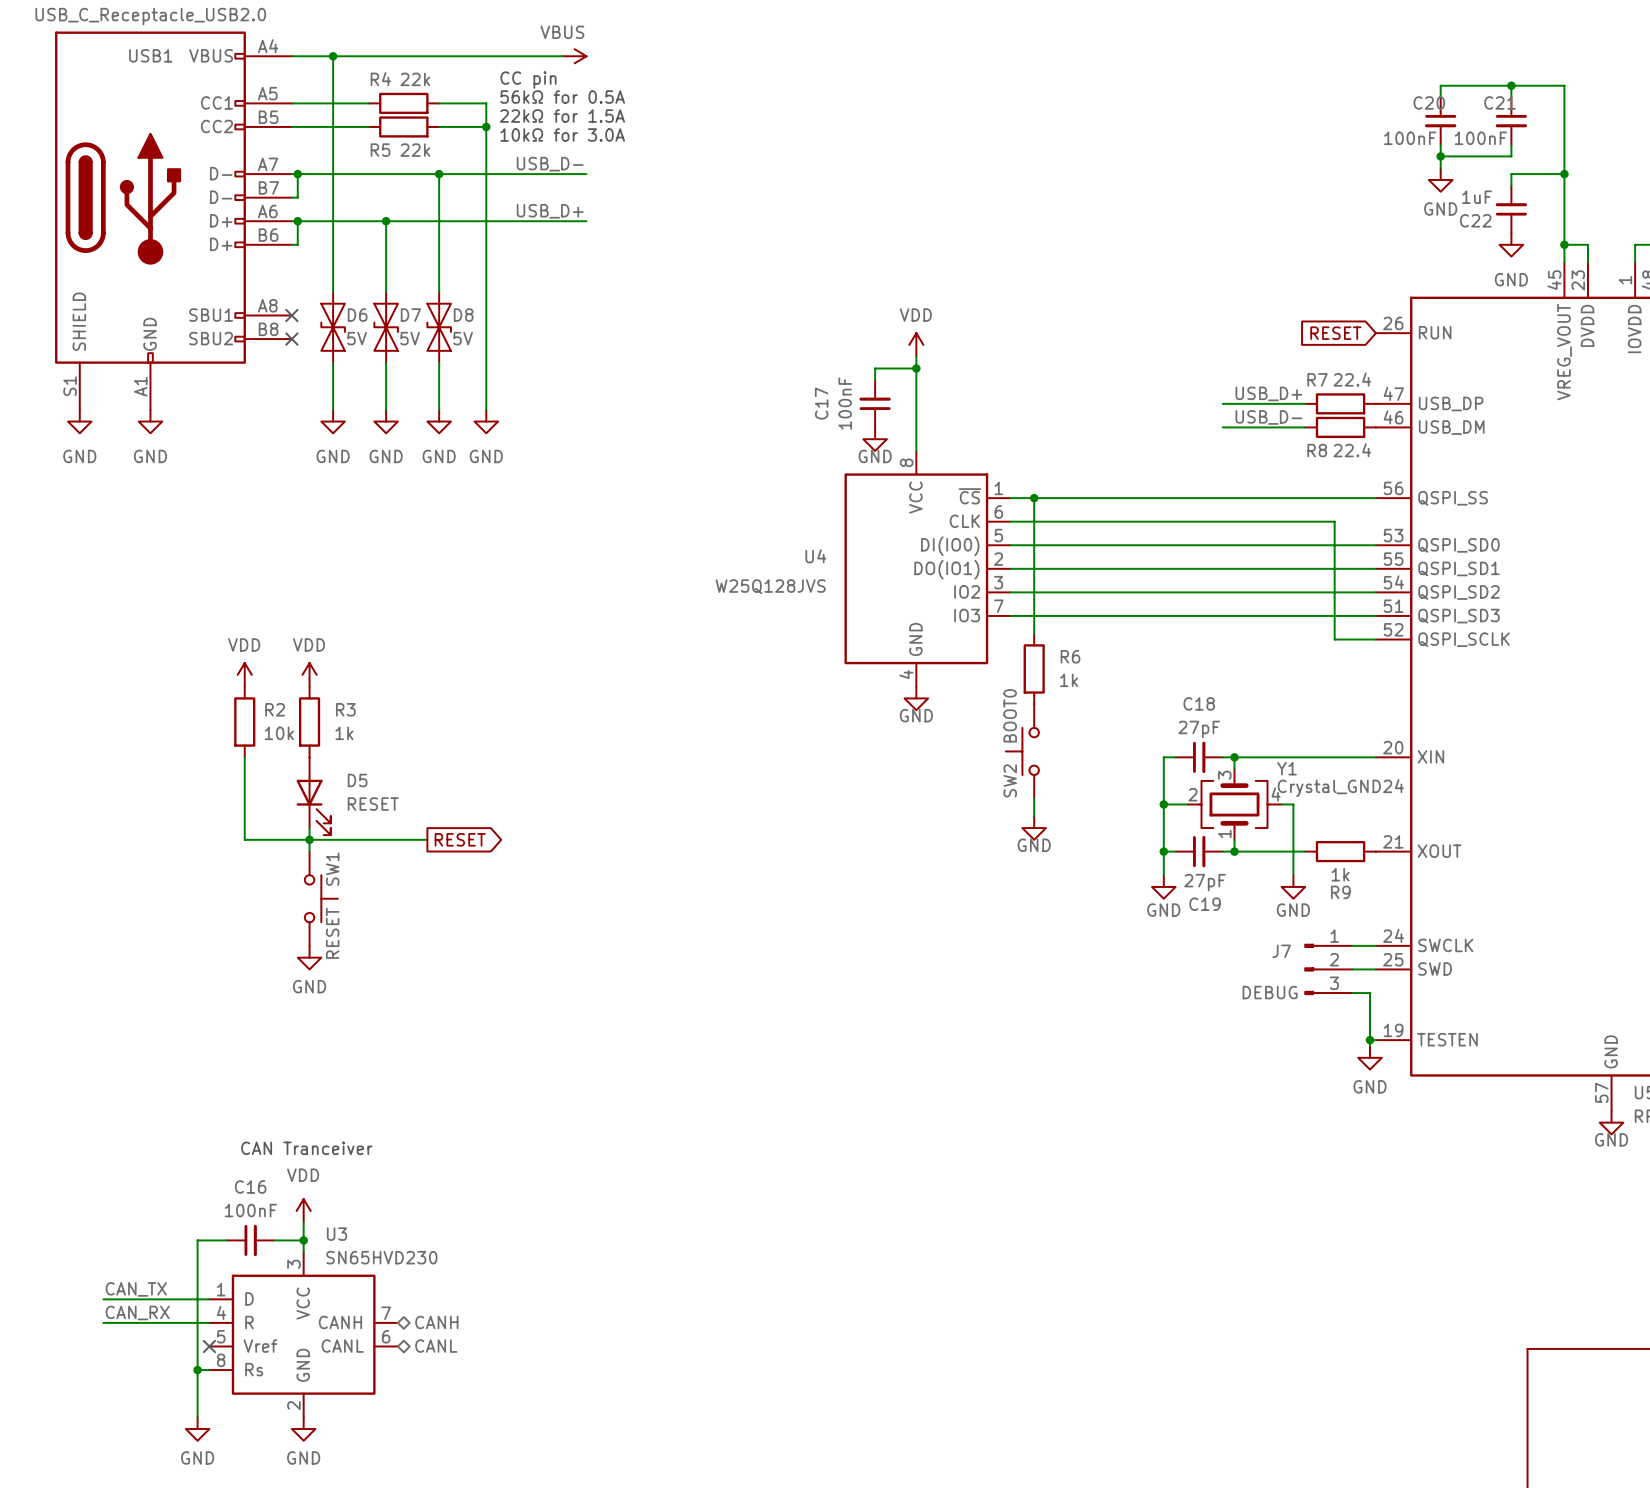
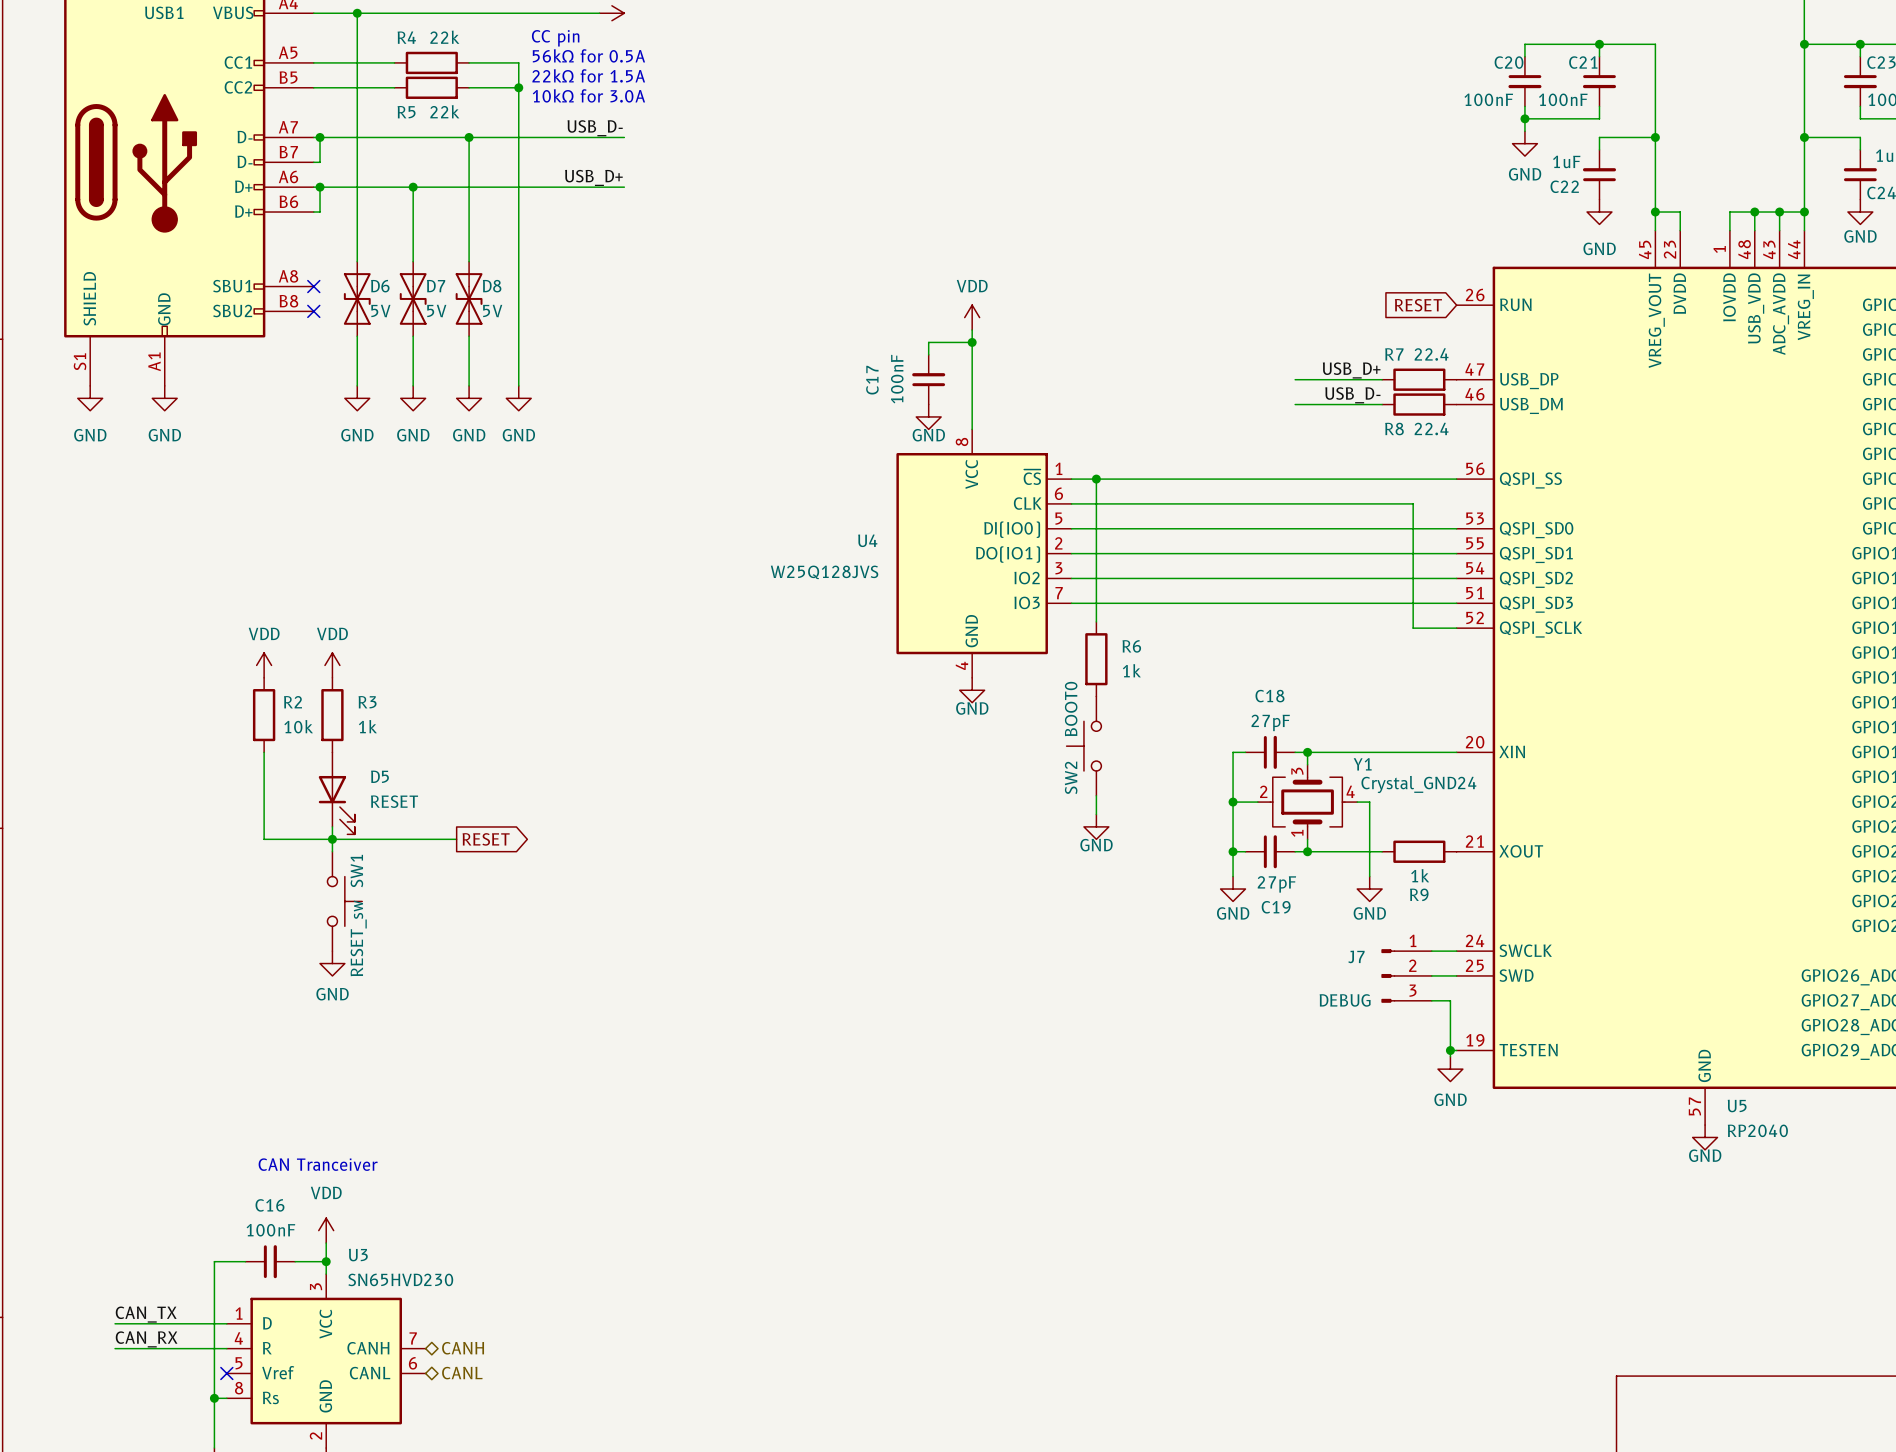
SW1 value: RESET (332, 933) -> RESET_sw (358, 938)

